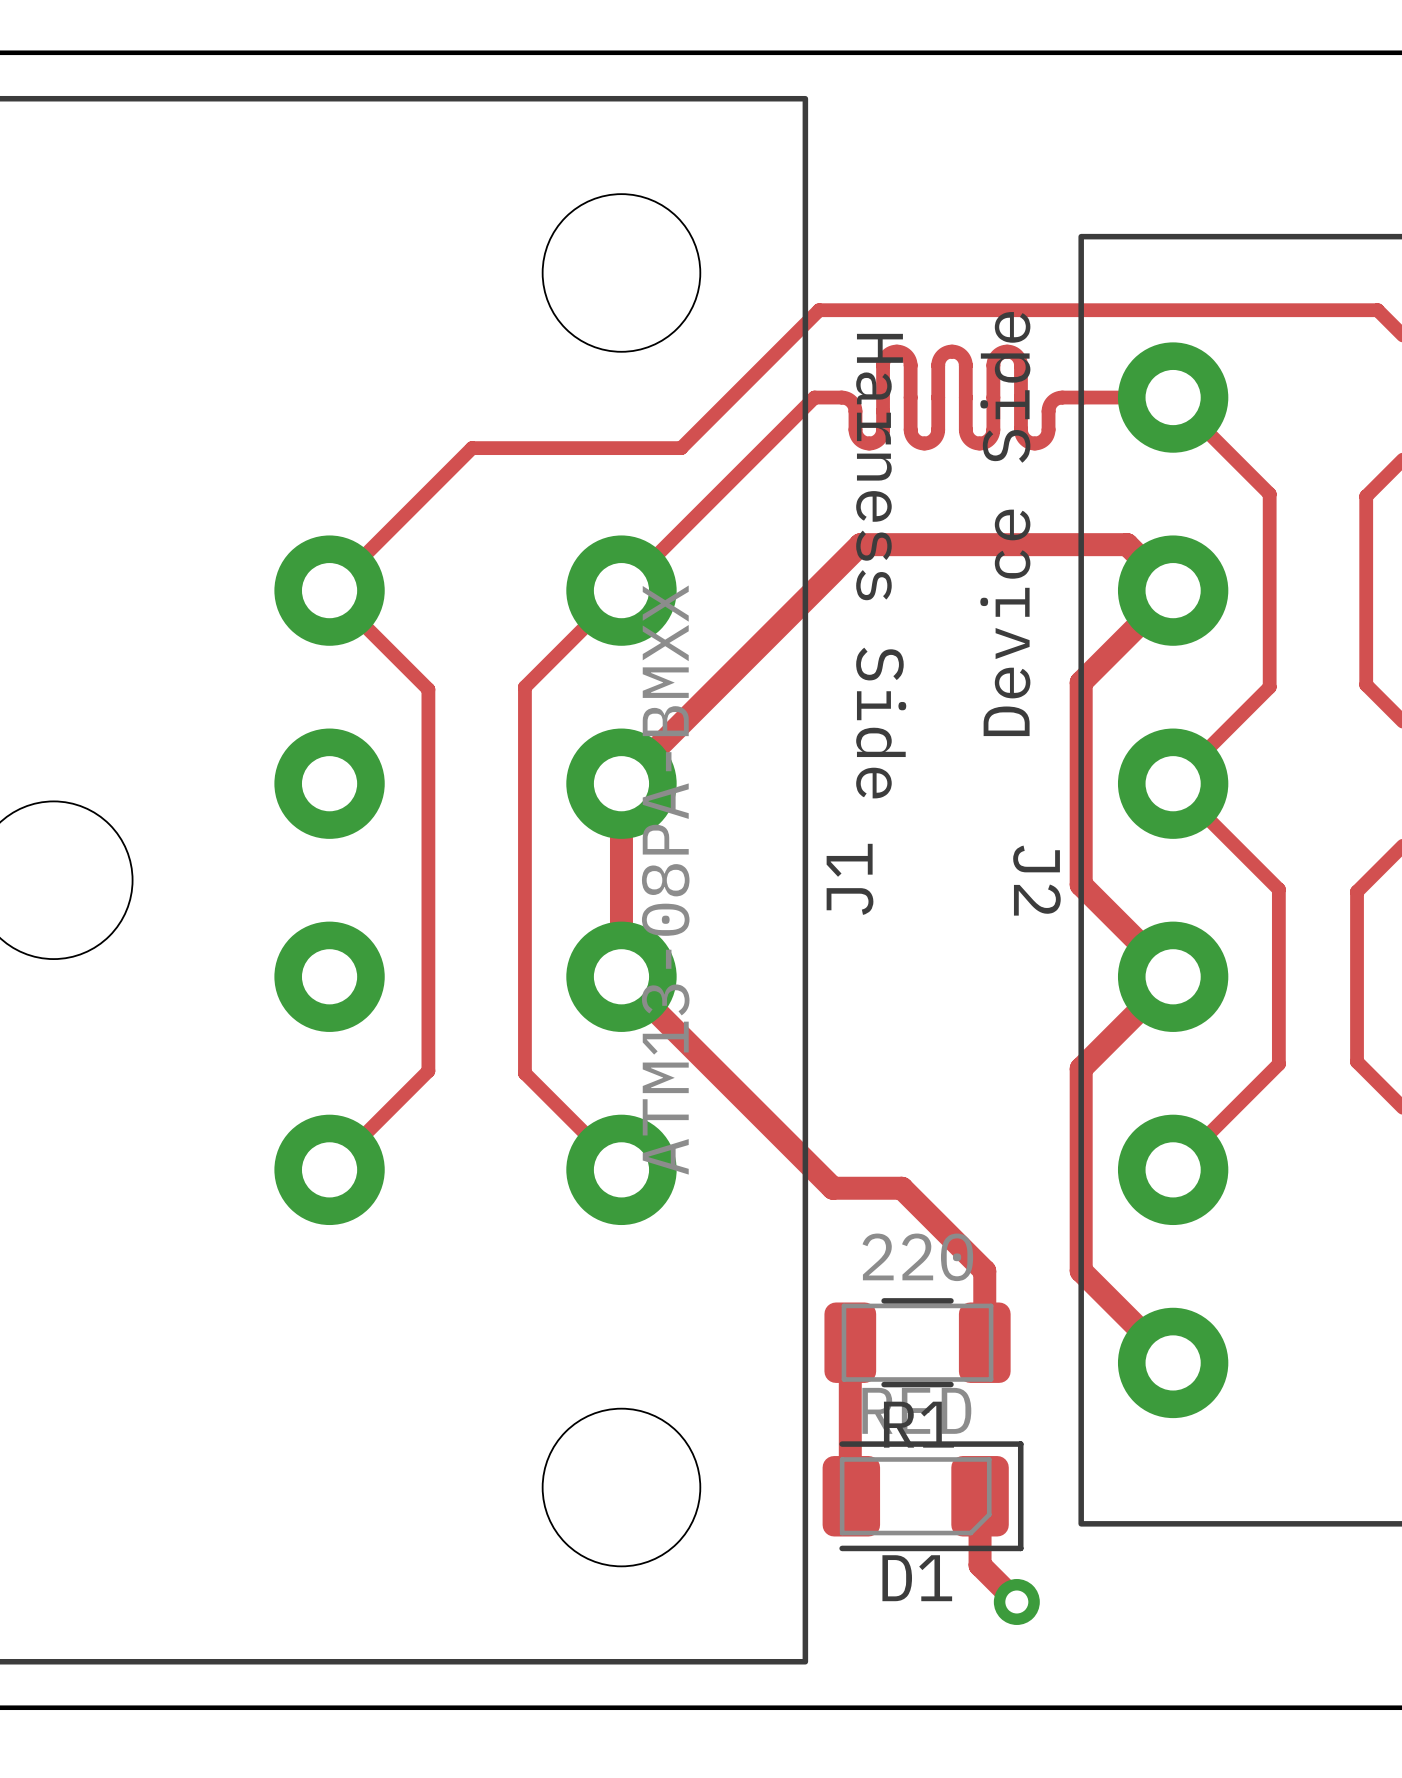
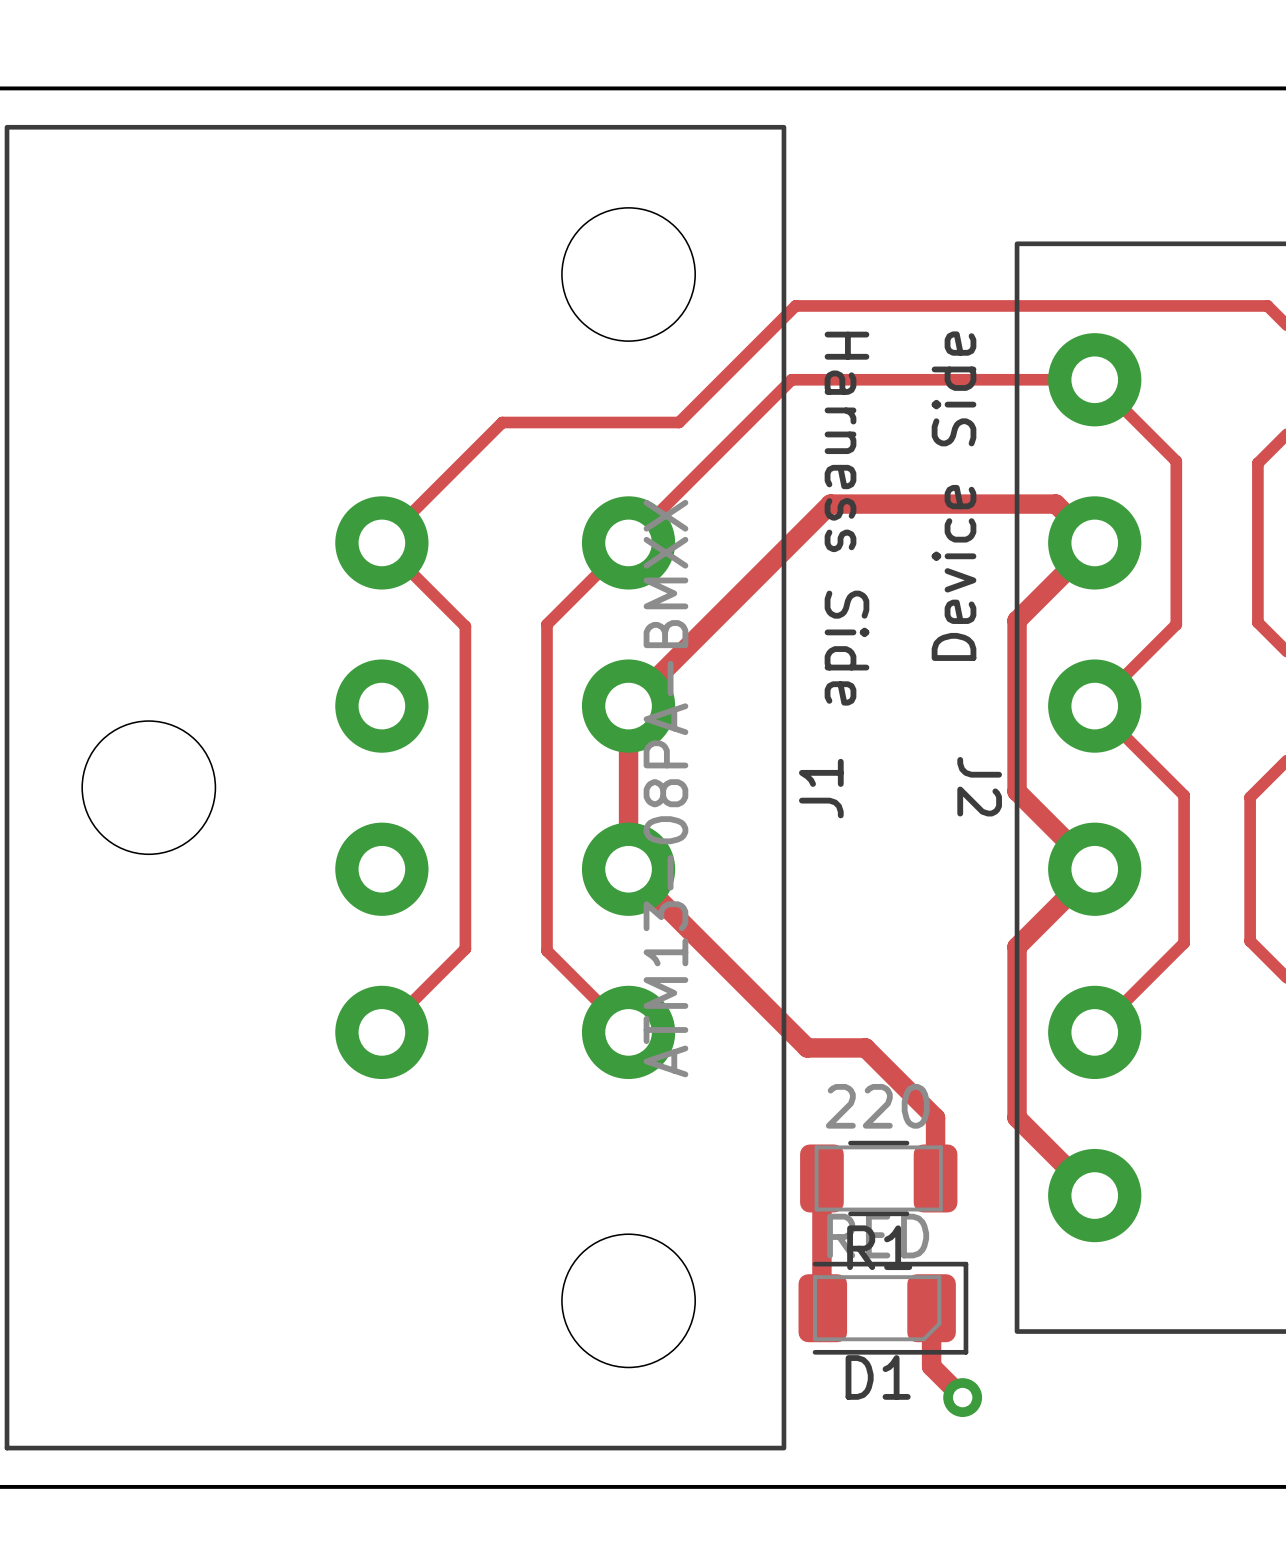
top track: (841, 397) (848, 399) (853, 404) (856, 435) (860, 440) (869, 443) (877, 440) (882, 433) (883, 363) (885, 356) (893, 352) (903, 353) (910, 361) (910, 431) (914, 439) (920, 443) (931, 441) (937, 433) (938, 363) (941, 356) (948, 352) (958, 353) (965, 361) (965, 431) (968, 438) (974, 442) (984, 442) (992, 433) (993, 363) (1000, 353) (1012, 352) (1020, 361) (1021, 431) (1026, 440) (1036, 443) (1045, 438) (1048, 431) (1049, 406) (1053, 400) (1062, 397) -> (814, 379) (1001, 379)

